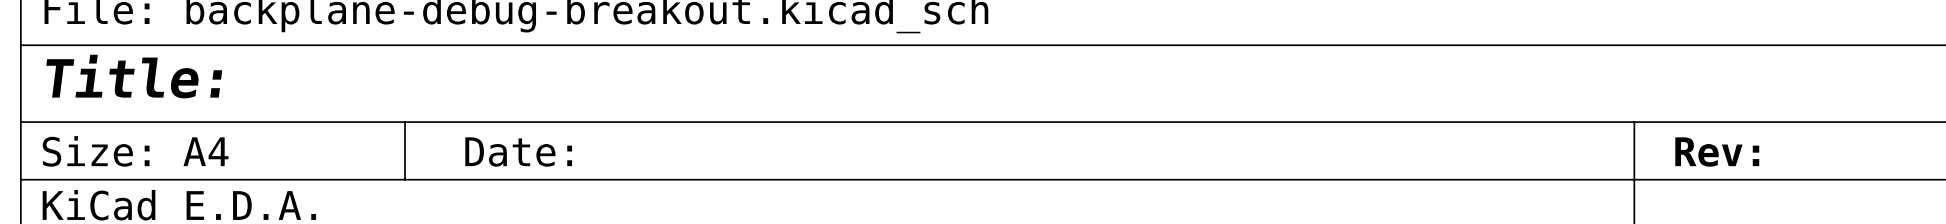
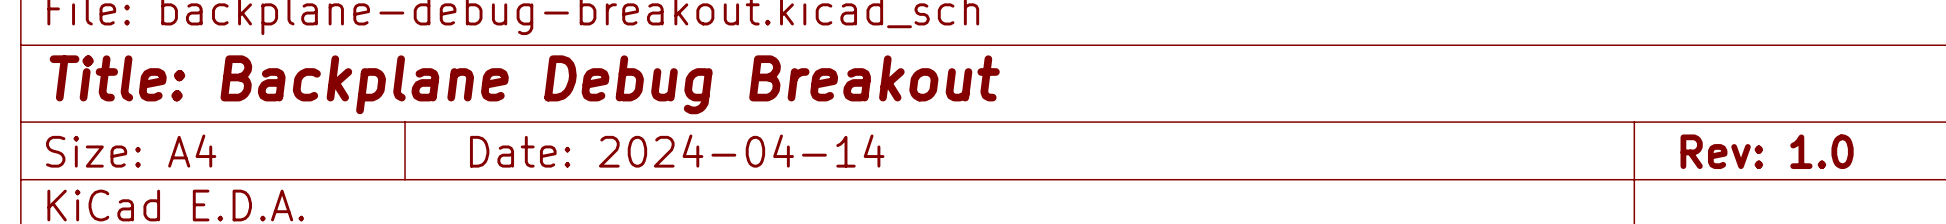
title block: Title: (134, 76) -> Title: Backplane Debug Breakout (524, 84)
title block: Date: (518, 152) -> Date: 2024-04-14 (677, 151)
title block: Rev: (1717, 152) -> Rev: 1.0 (1767, 151)

